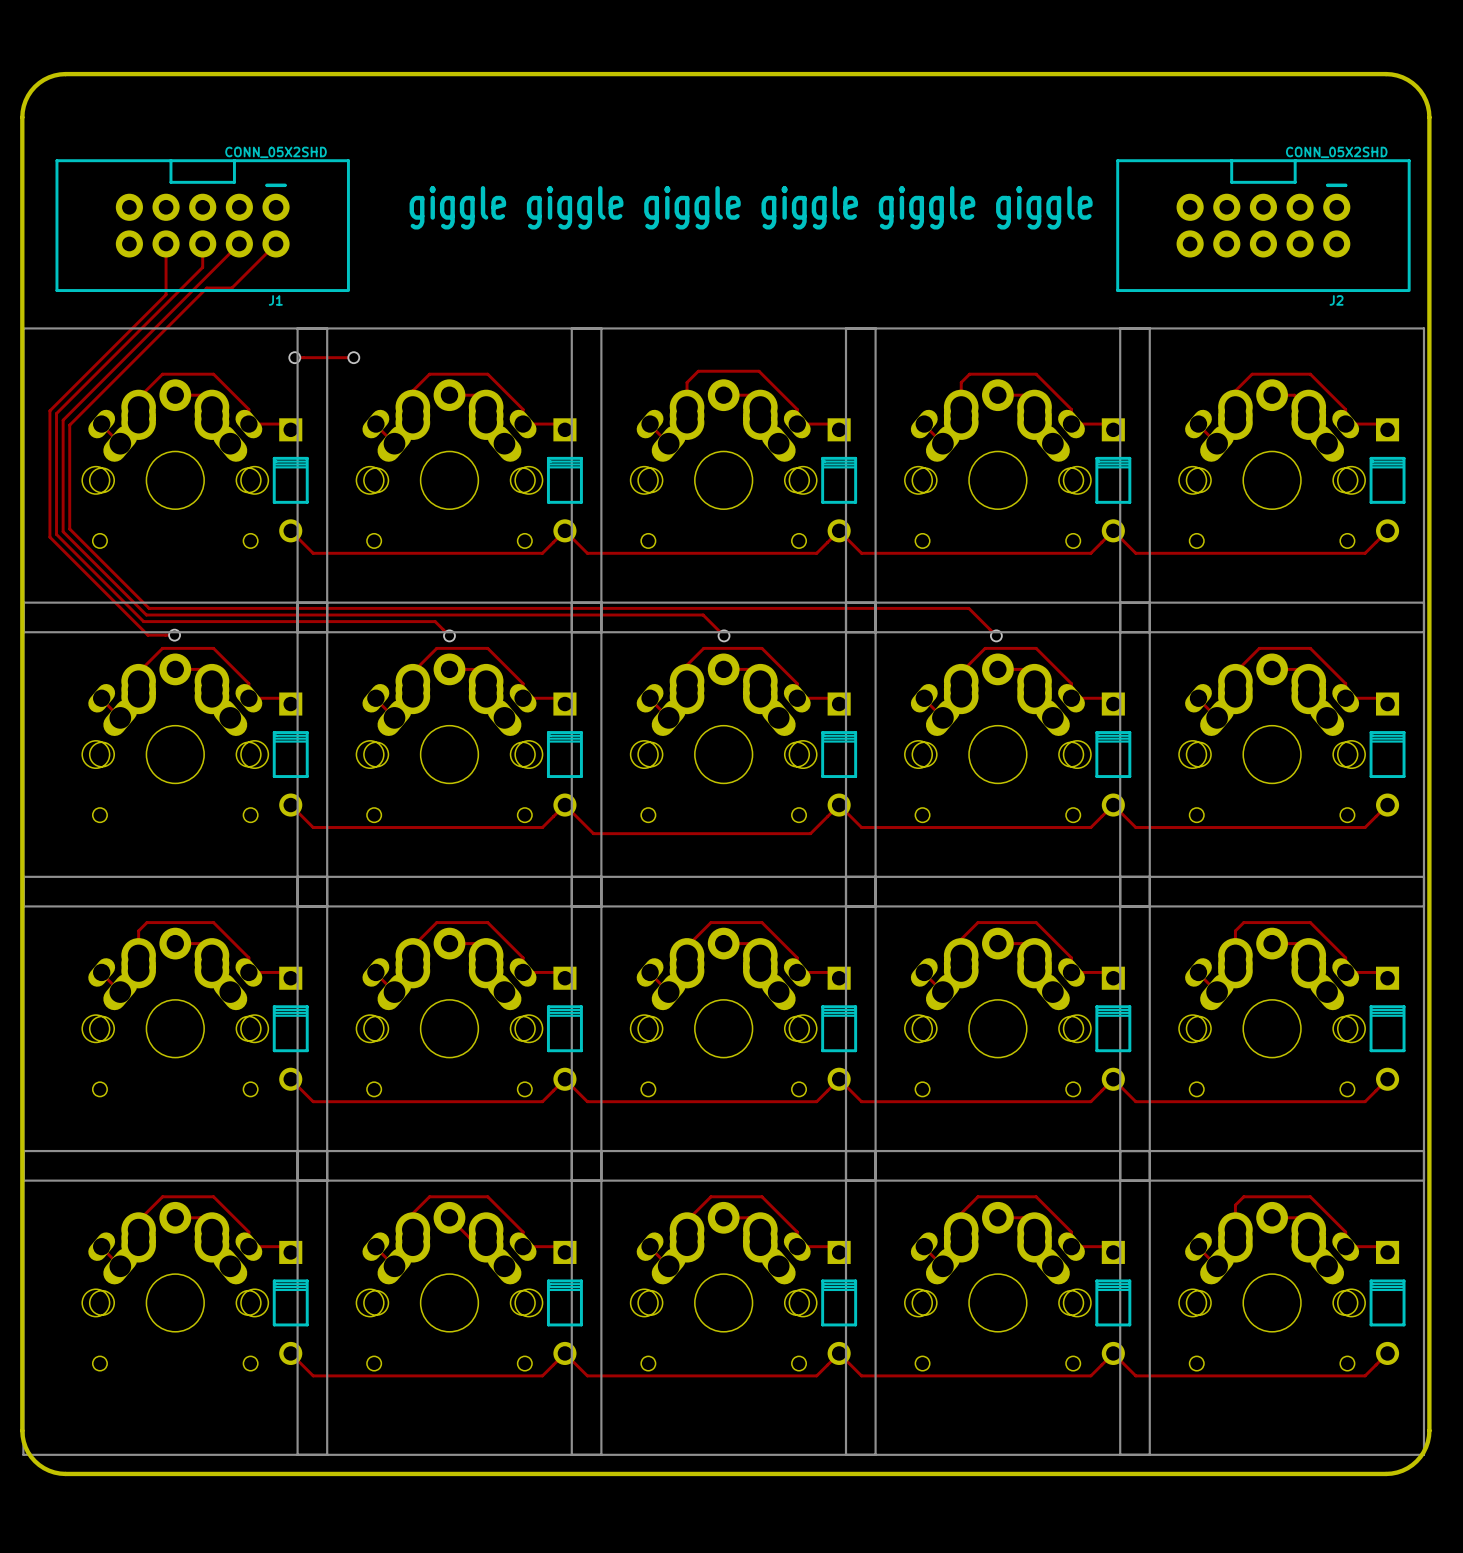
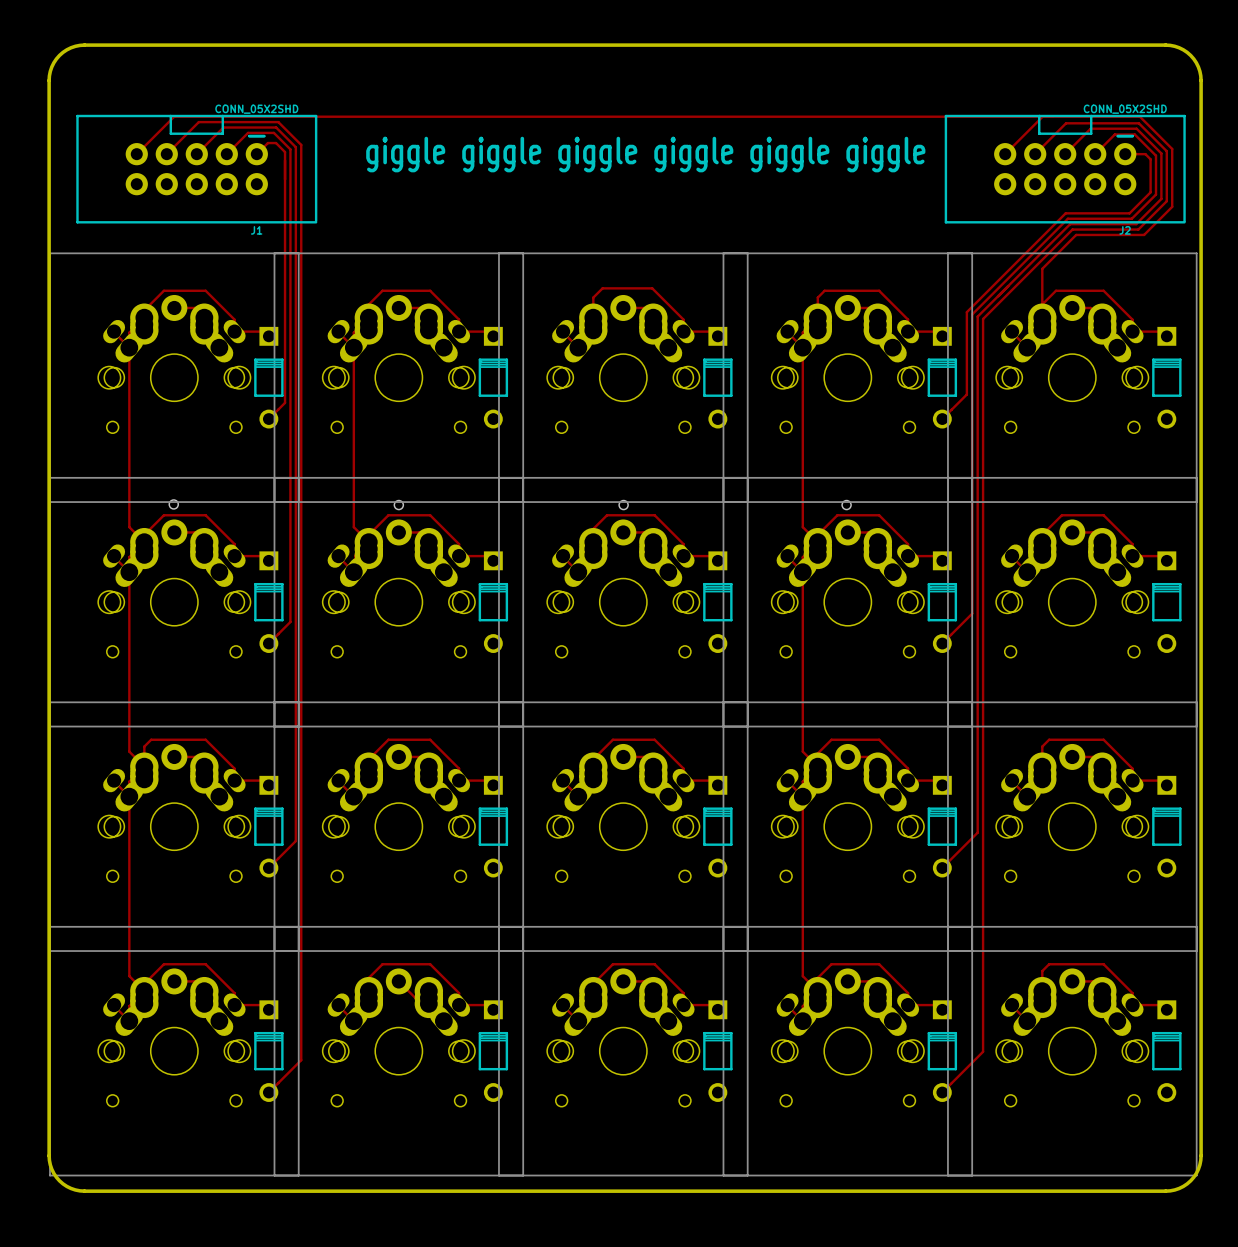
track: none -> (1042, 116) (1005, 154)
track: none -> (136, 154) (174, 116) (1139, 116) (1172, 148) (1172, 206) (1144, 234) (1076, 234) (1042, 268) (1042, 304)
track: none -> (1035, 154) (1066, 123) (1138, 123) (1166, 151) (1166, 201) (1138, 229) (1072, 229) (983, 318) (983, 1051) (942, 1092)
track: none -> (1065, 154) (1090, 128) (1136, 128) (1161, 153) (1161, 198) (1136, 224) (1070, 224) (977, 316) (977, 832) (942, 868)
track: none -> (1095, 154) (1114, 134) (1134, 134) (1156, 155) (1156, 194) (1131, 218) (1067, 218) (972, 314) (972, 613) (942, 643)
track: none -> (1125, 154) (1145, 154) (1150, 159) (1150, 192) (1129, 213) (1065, 213) (966, 312) (966, 394) (942, 419)
track: (166, 243) (166, 294) (49, 410) (49, 537) (147, 635) (174, 635) -> none
track: (202, 243) (202, 267) (56, 413) (56, 534) (143, 621) (435, 621) (449, 635) -> none
track: (239, 243) (63, 420) (63, 531) (146, 615) (703, 615) (724, 635) -> none
track: (276, 243) (231, 288) (206, 288) (69, 425) (69, 528) (149, 608) (968, 608) (996, 635) -> none
track: (294, 357) (353, 357) -> none
via: (294, 357) -> none
via: (353, 357) -> none
track: none -> (144, 317) (129, 332) (129, 527) (144, 542) (129, 557) (129, 751) (144, 766) (129, 781) (129, 976) (144, 991) (129, 1006) (129, 1018)
track: none -> (368, 317) (353, 332) (353, 527) (368, 542) (355, 555) (355, 570)
track: none -> (817, 317) (802, 332) (802, 527) (817, 542) (802, 557) (802, 751) (817, 766) (802, 781) (802, 976) (817, 991) (802, 1006) (802, 1021)
track: (290, 530) (313, 553) (542, 553) (564, 530) (587, 553) (816, 553) (839, 530) (861, 553) (1090, 553) (1113, 530) (1135, 553) (1365, 553) (1387, 530) -> (268, 419) (285, 402) (285, 152) (276, 143) (267, 143) (256, 154)
track: (290, 805) (313, 827) (542, 827) (564, 805) (593, 833) (810, 833) (839, 805) (861, 827) (1090, 827) (1113, 805) (1135, 827) (1365, 827) (1387, 805) -> (268, 643) (290, 621) (290, 149) (273, 132) (248, 132) (226, 154)
track: (290, 1079) (313, 1101) (542, 1101) (564, 1079) (587, 1101) (816, 1101) (839, 1079) (861, 1101) (1090, 1101) (1113, 1079) (1135, 1101) (1365, 1101) (1387, 1079) -> (268, 868) (295, 841) (295, 147) (276, 127) (223, 127) (196, 154)
track: (290, 1353) (313, 1375) (542, 1375) (564, 1353) (587, 1375) (816, 1375) (839, 1353) (861, 1375) (1090, 1375) (1113, 1353) (1135, 1375) (1365, 1375) (1387, 1353) -> (268, 1092) (301, 1060) (301, 144) (278, 122) (198, 122) (166, 154)

